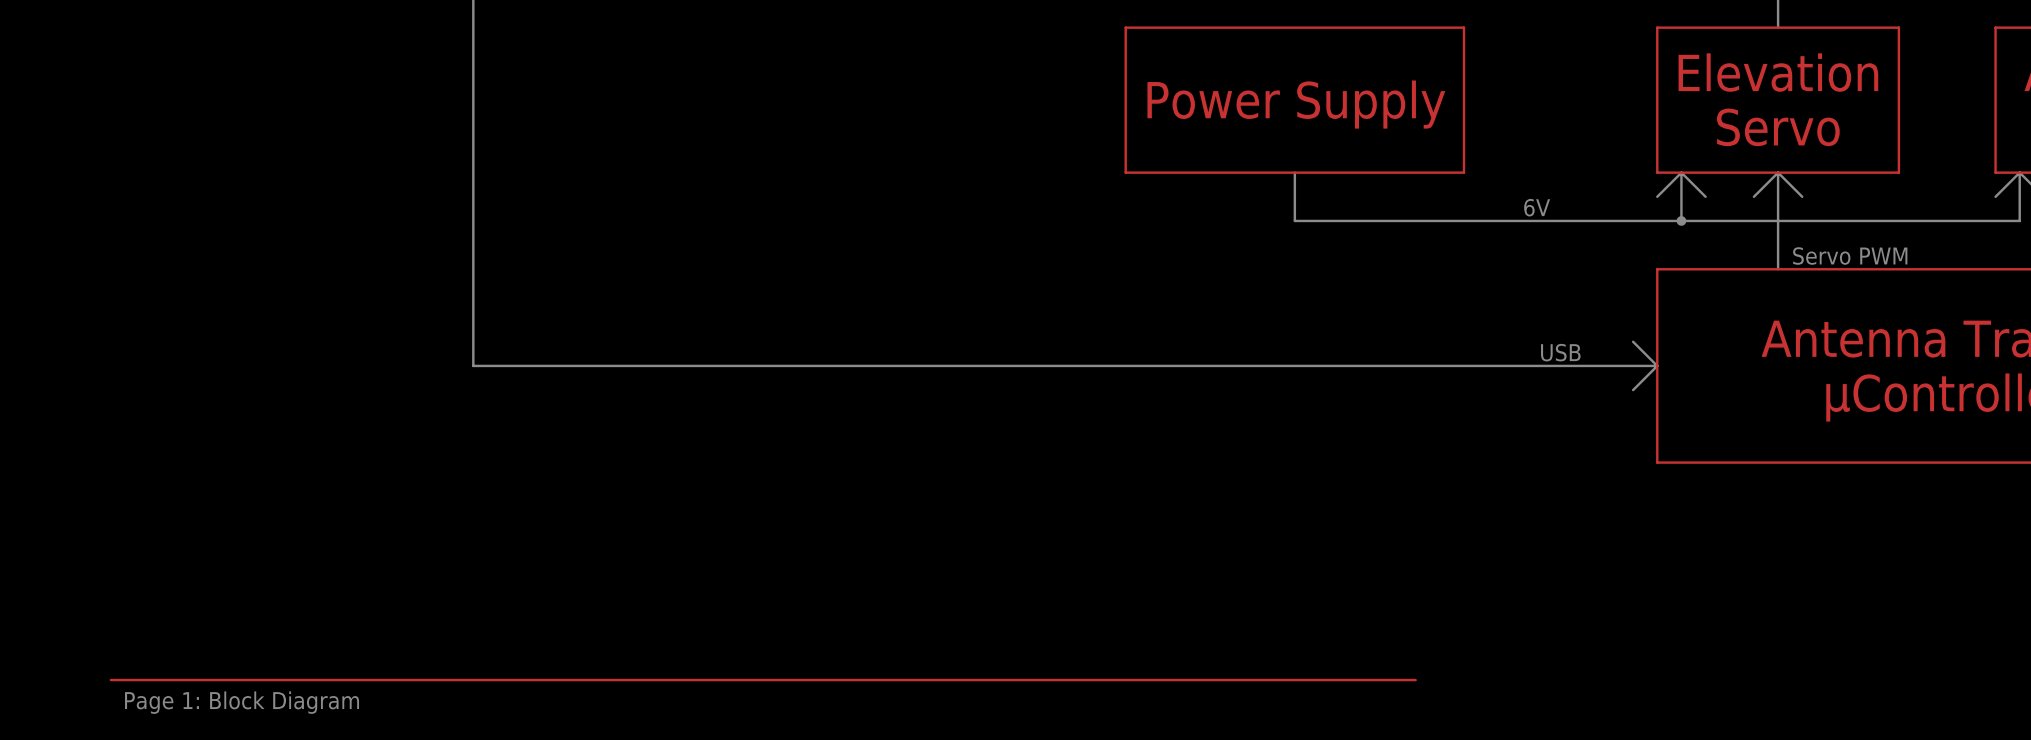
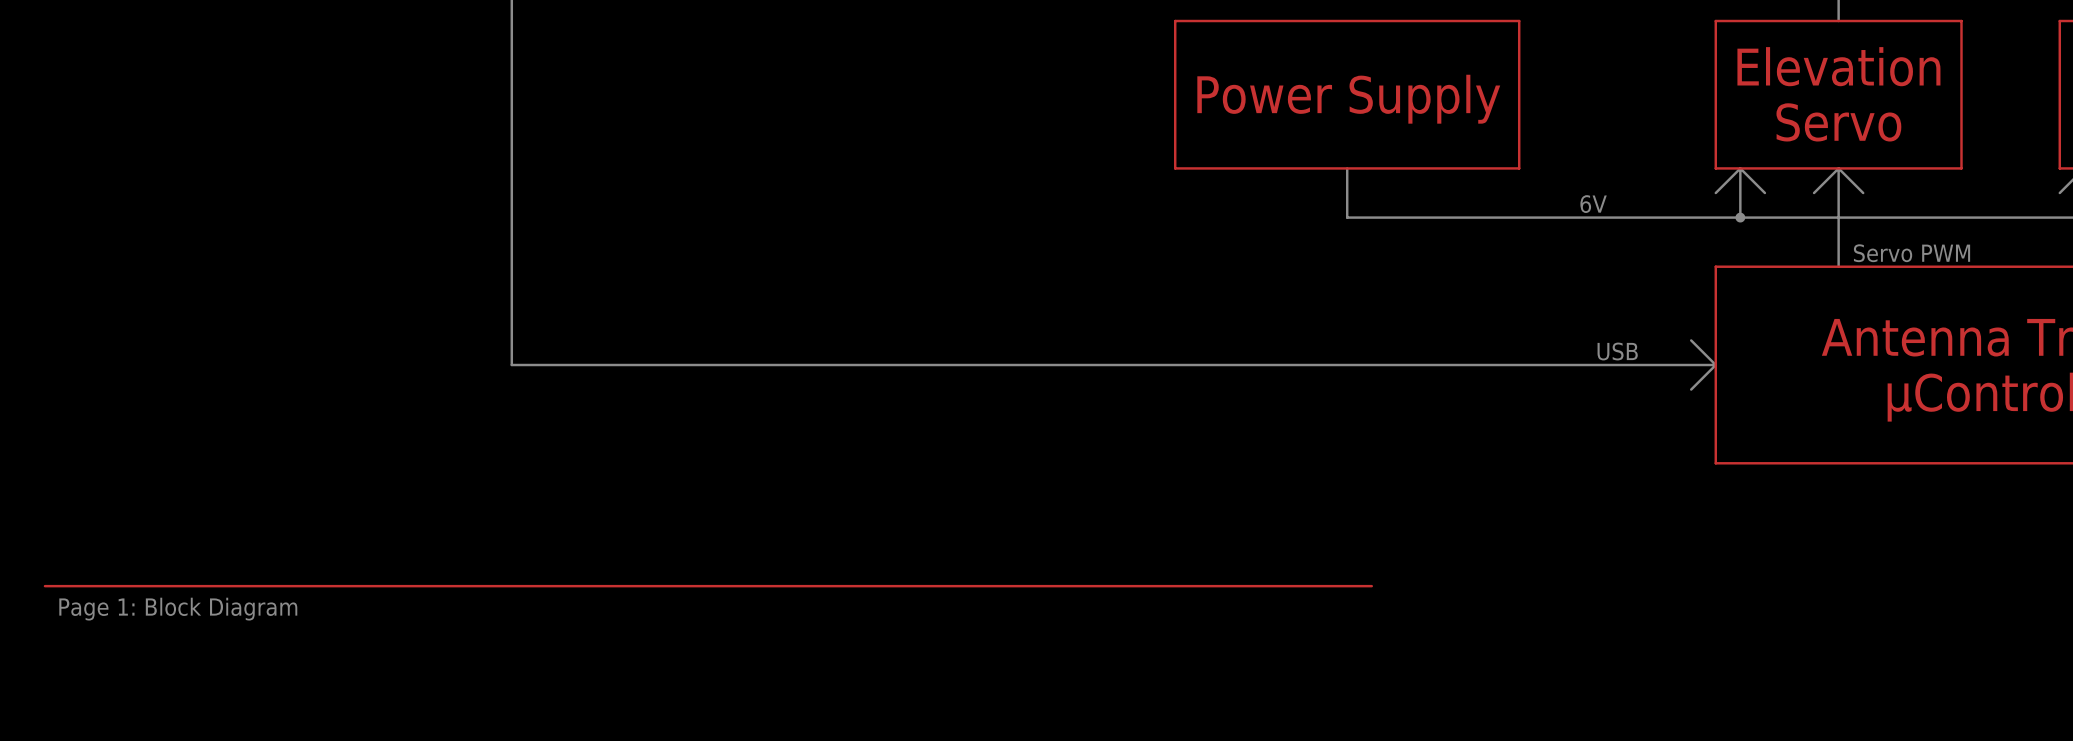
line: (110, 680) (1415, 680) -> (44, 586) (1371, 586)
text position: Page 1: Block Diagram (242, 702) -> Page 1: Block Diagram (178, 609)

